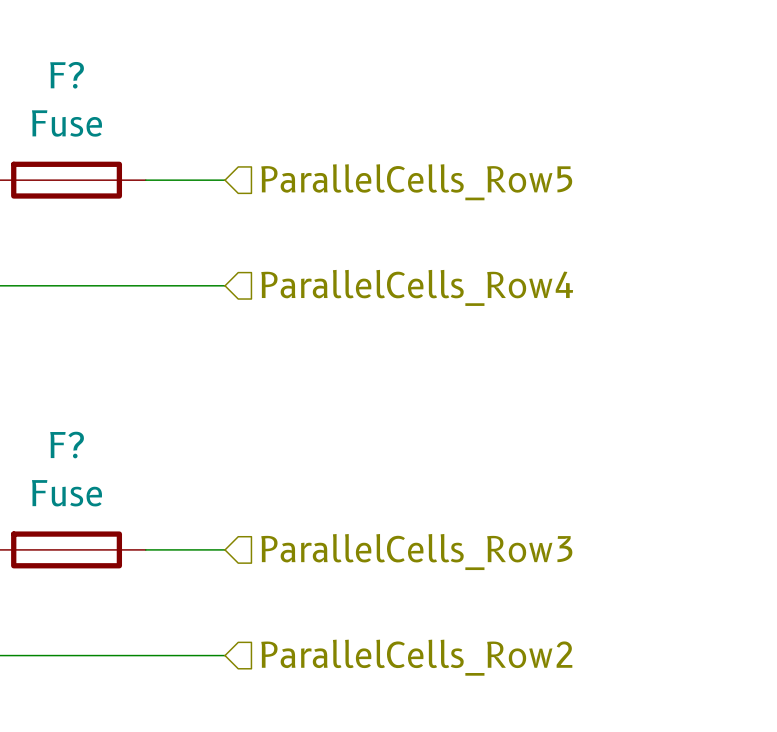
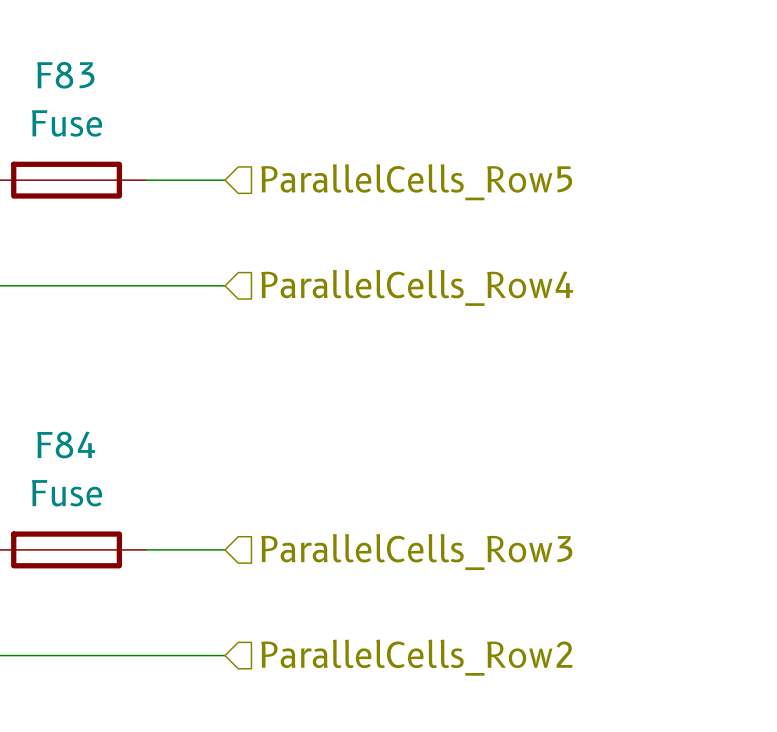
F? name: F? (67, 75) -> F83 (65, 75)
F? name: F? (67, 445) -> F84 (66, 445)

